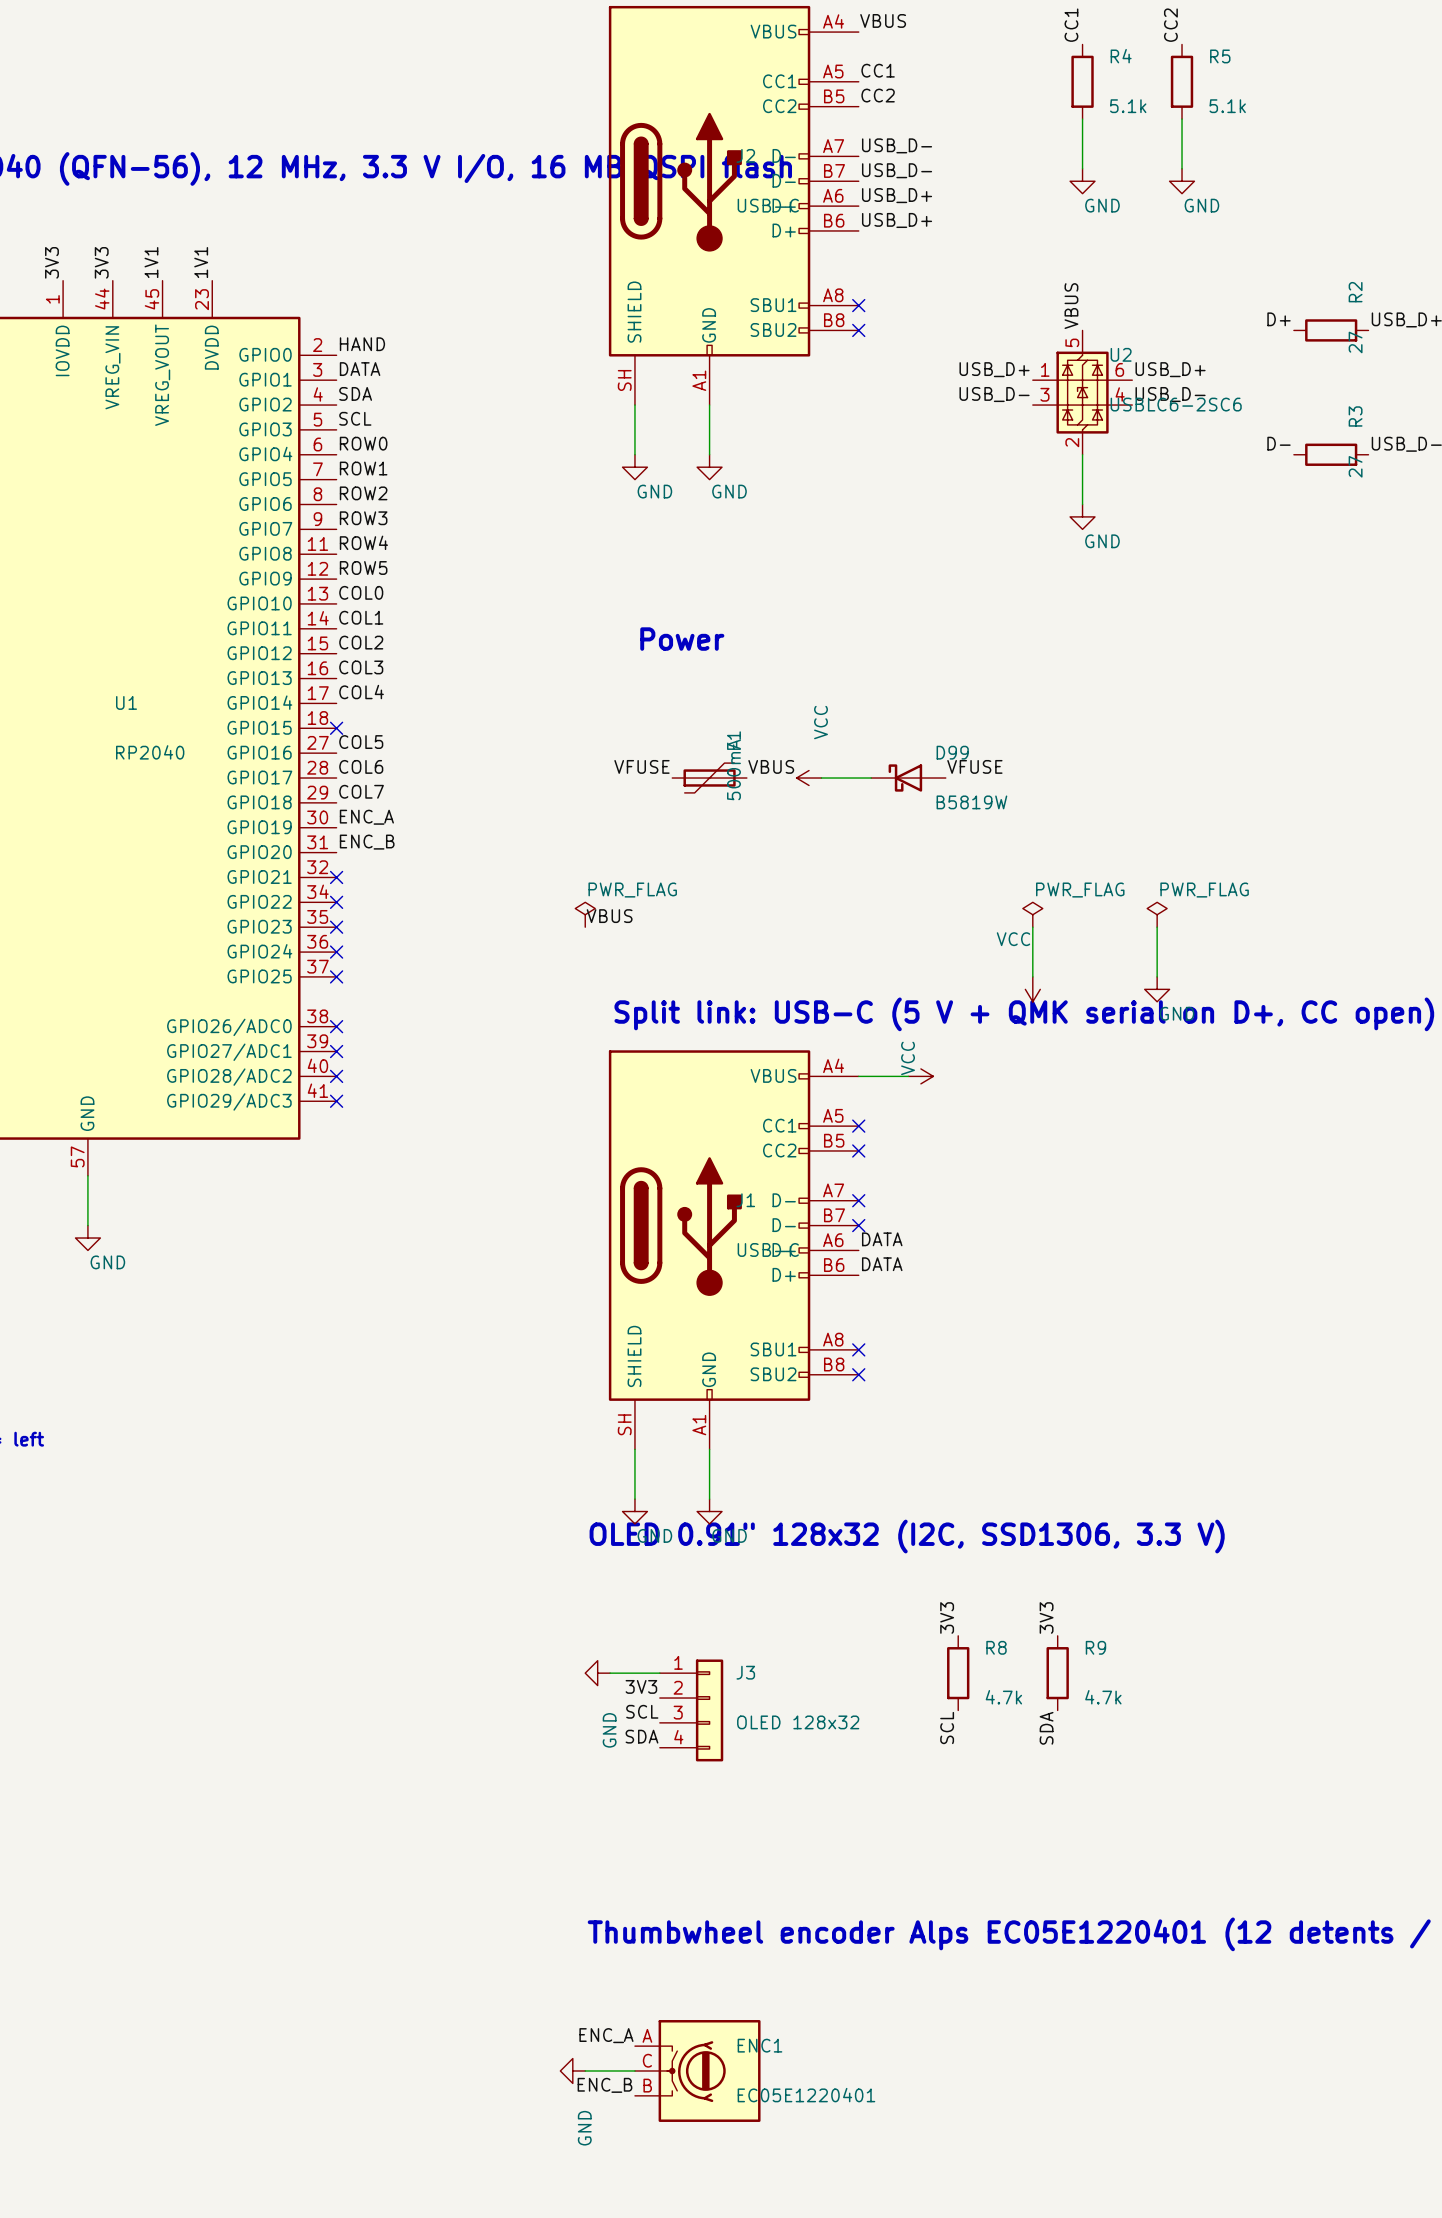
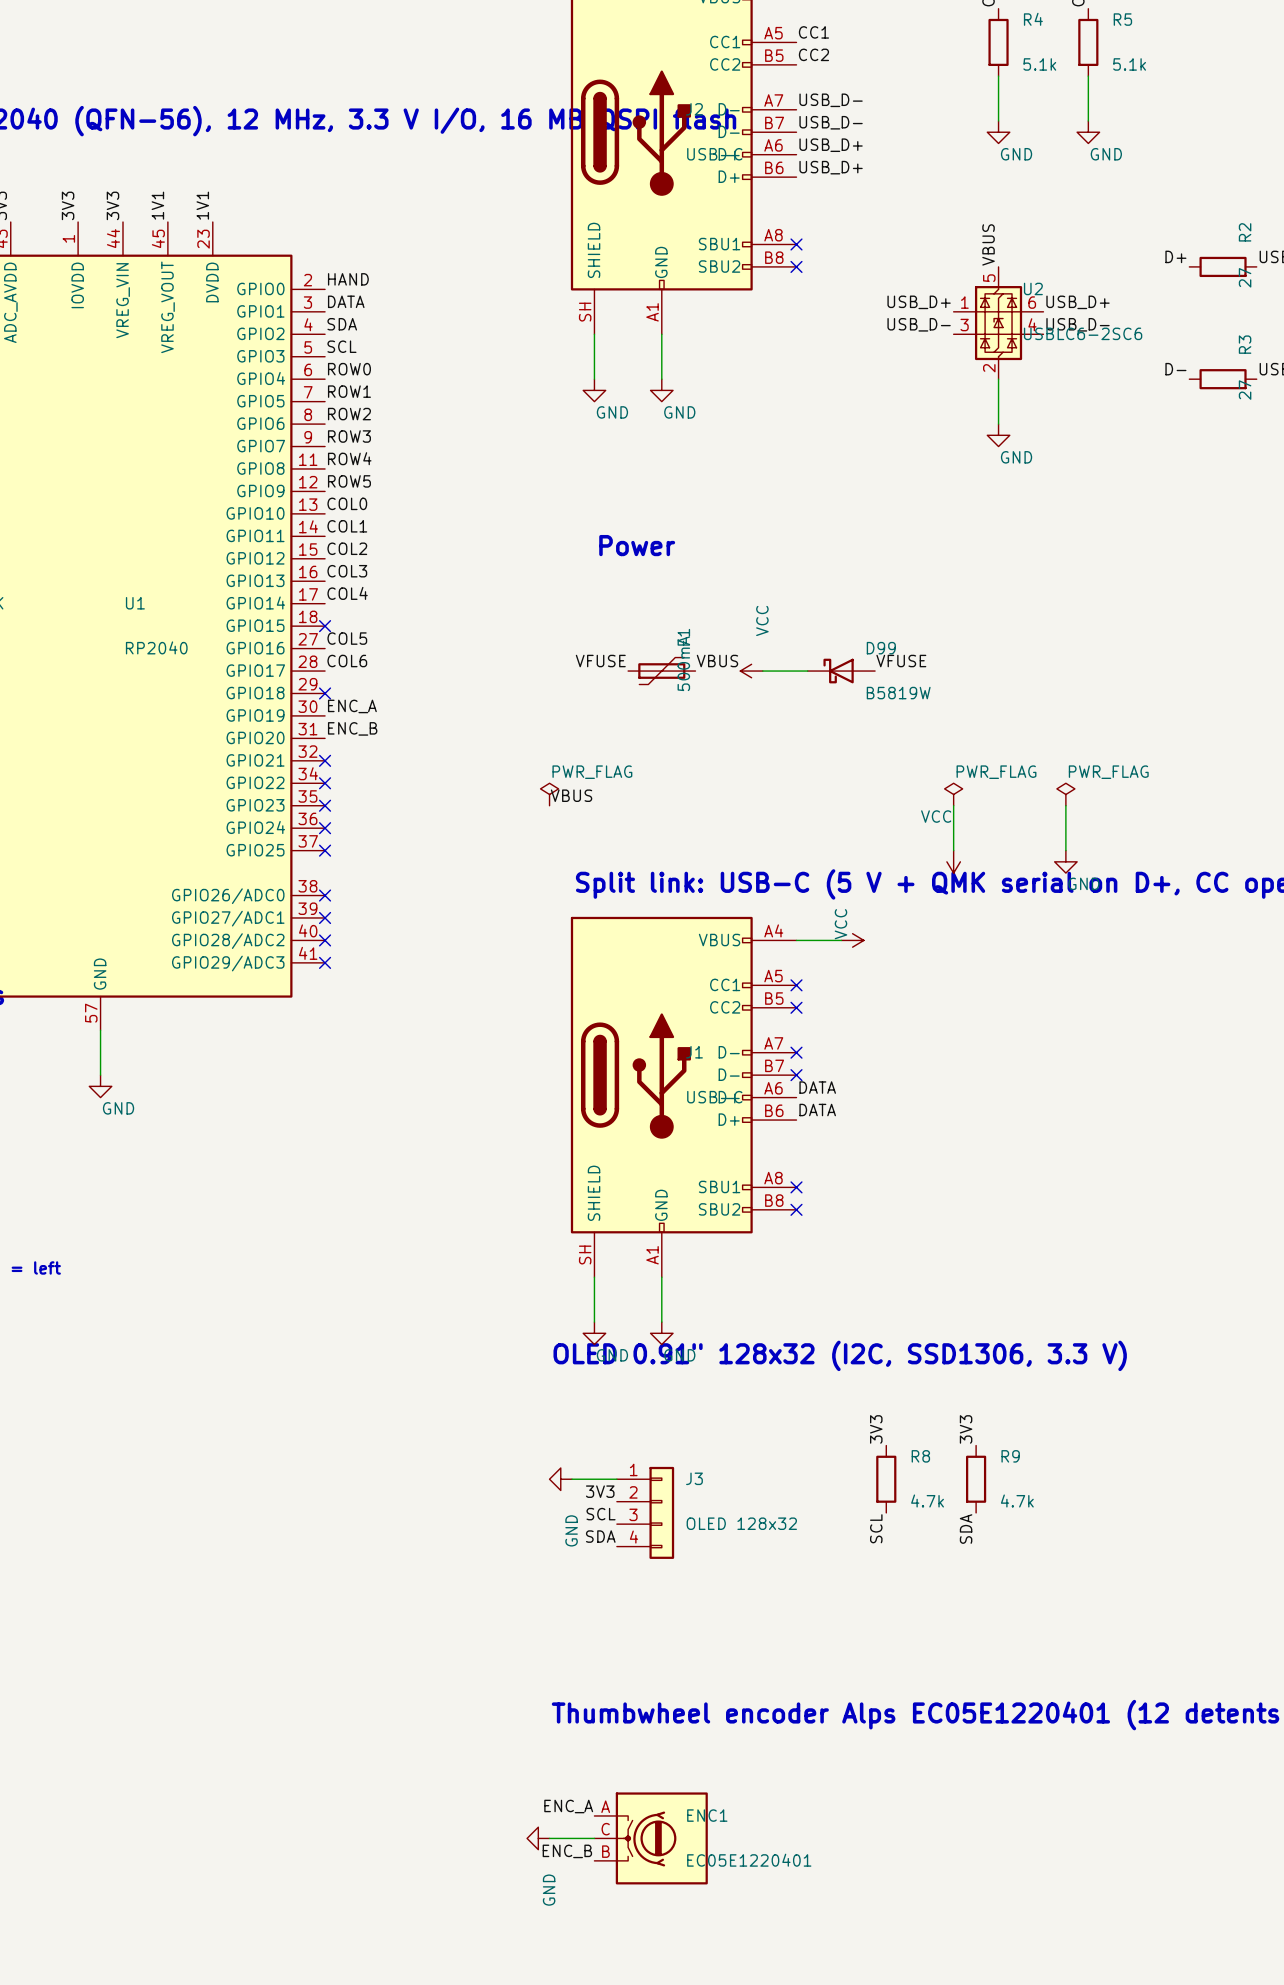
label: COL7 (361, 791) -> none
no-connect mark: none -> (325, 693)

